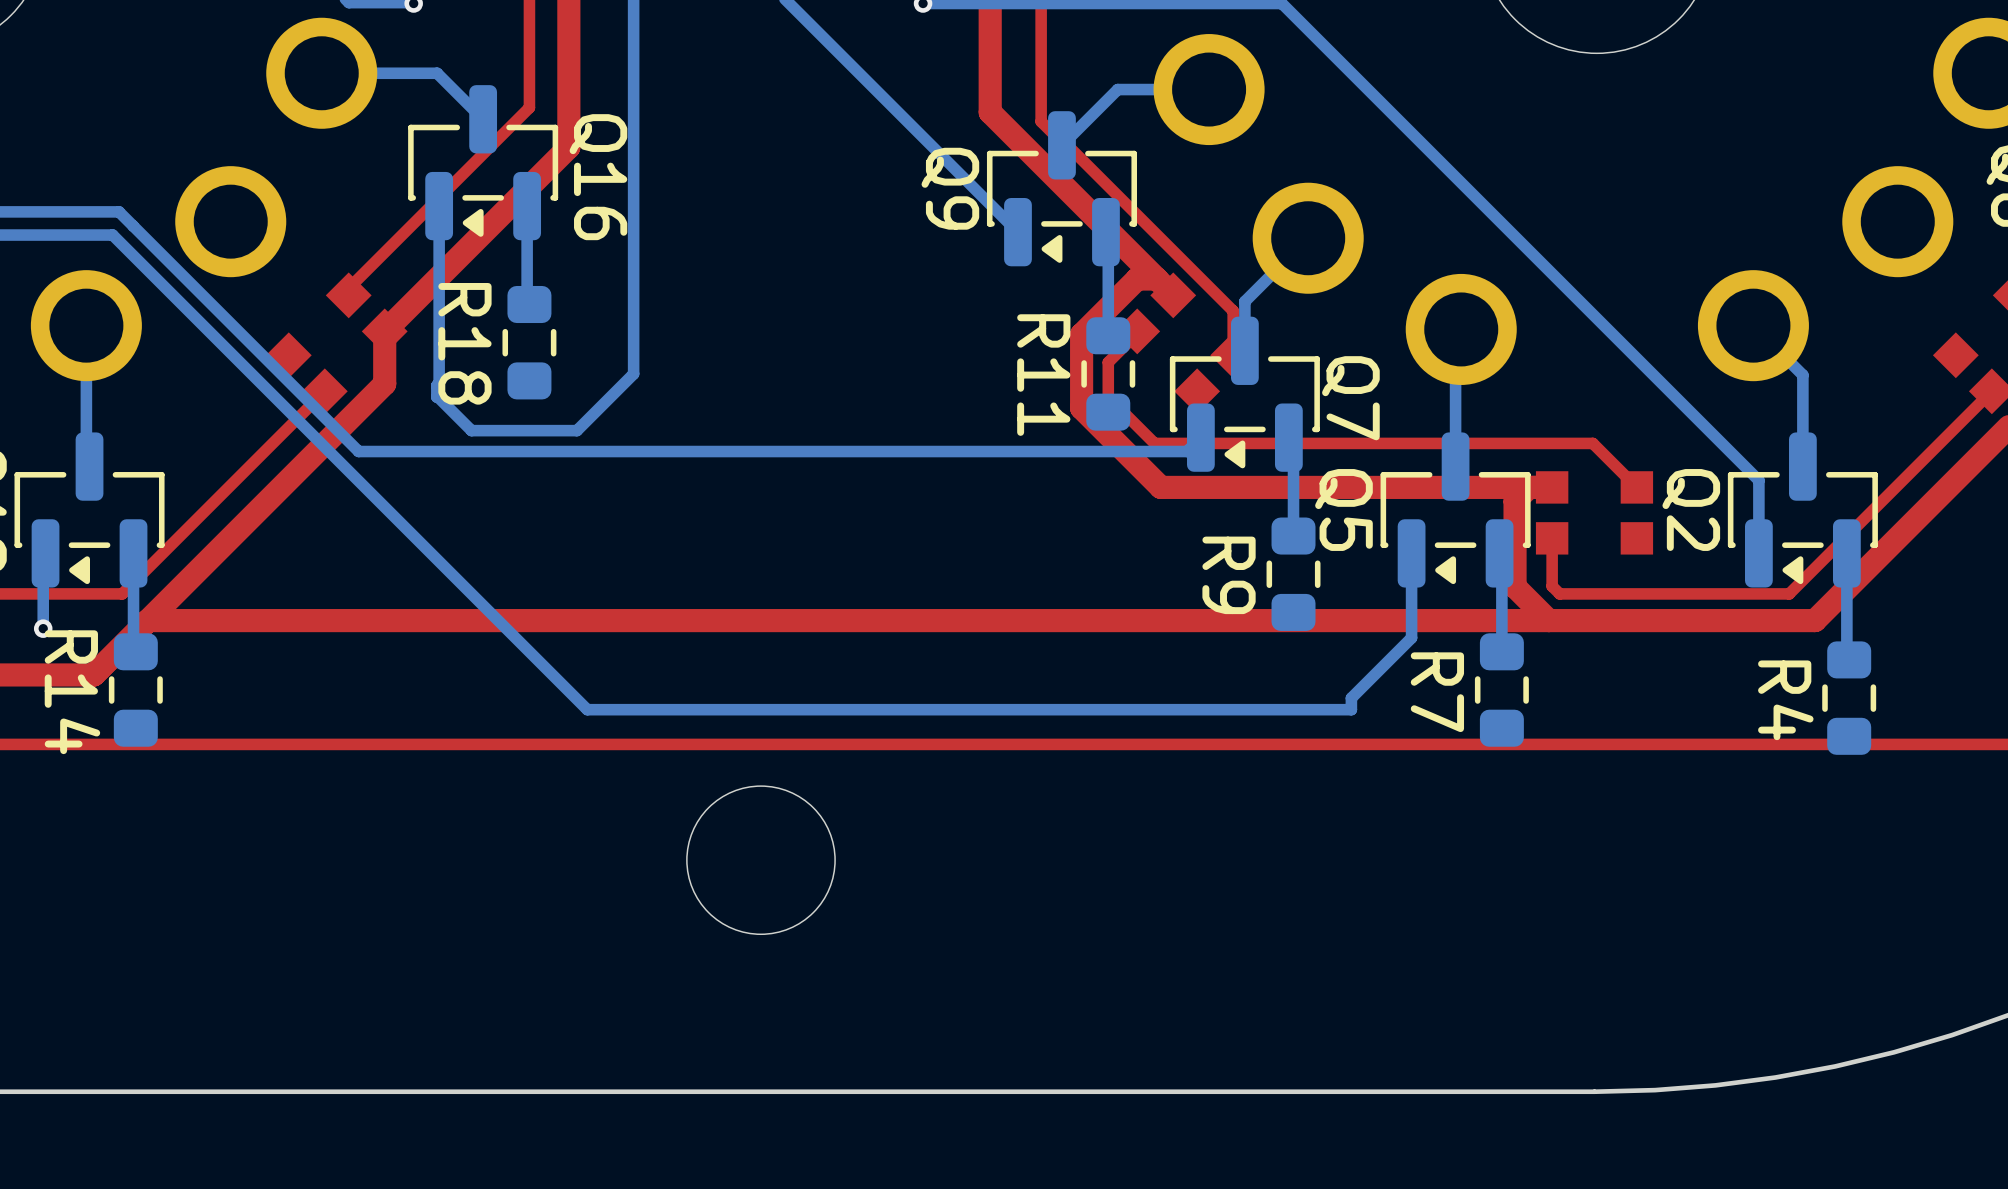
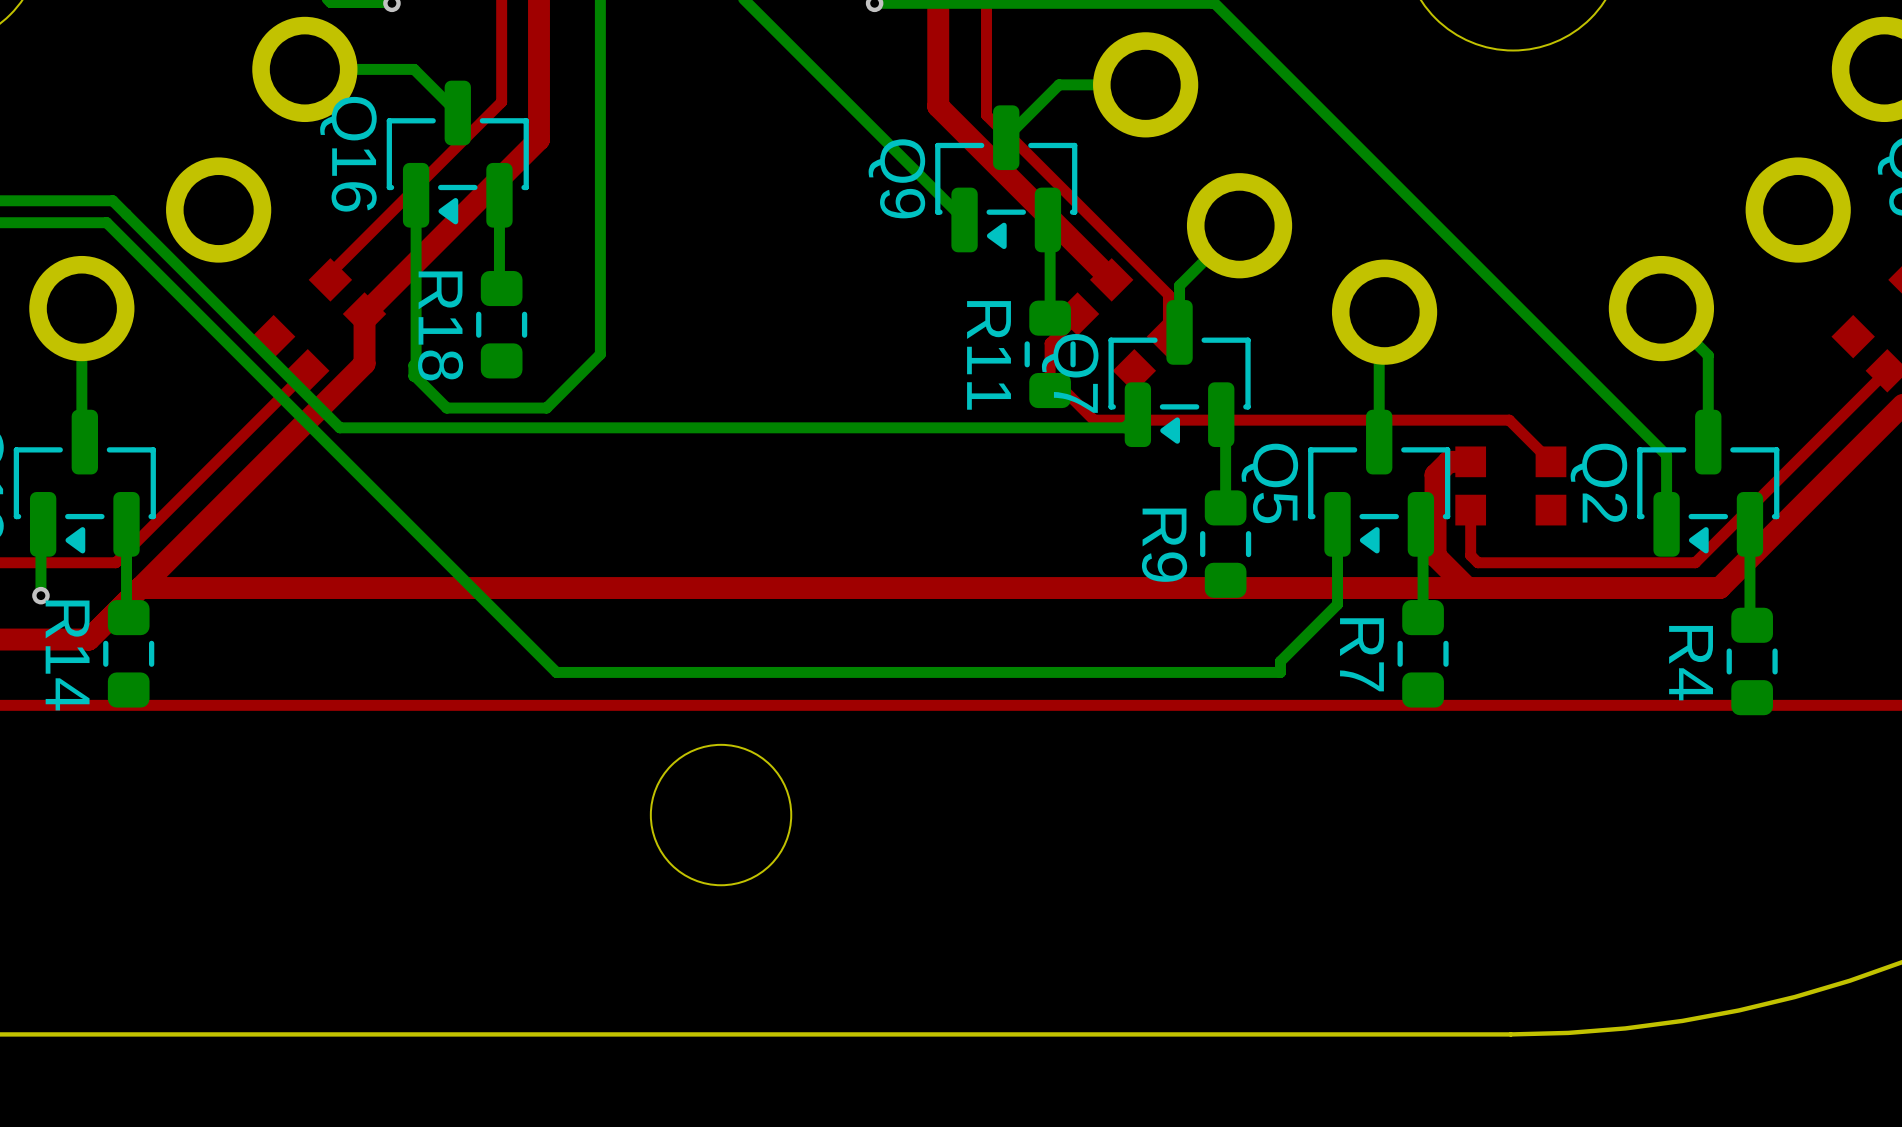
Q16 name position: Q16 (598, 177) -> Q16 (348, 154)
top track: (1156, 279) (1137, 279) (1081, 334) (1081, 408) (1160, 487) (1528, 487) -> none
Q7 name position: Q7 (1350, 398) -> Q7 (1070, 373)

